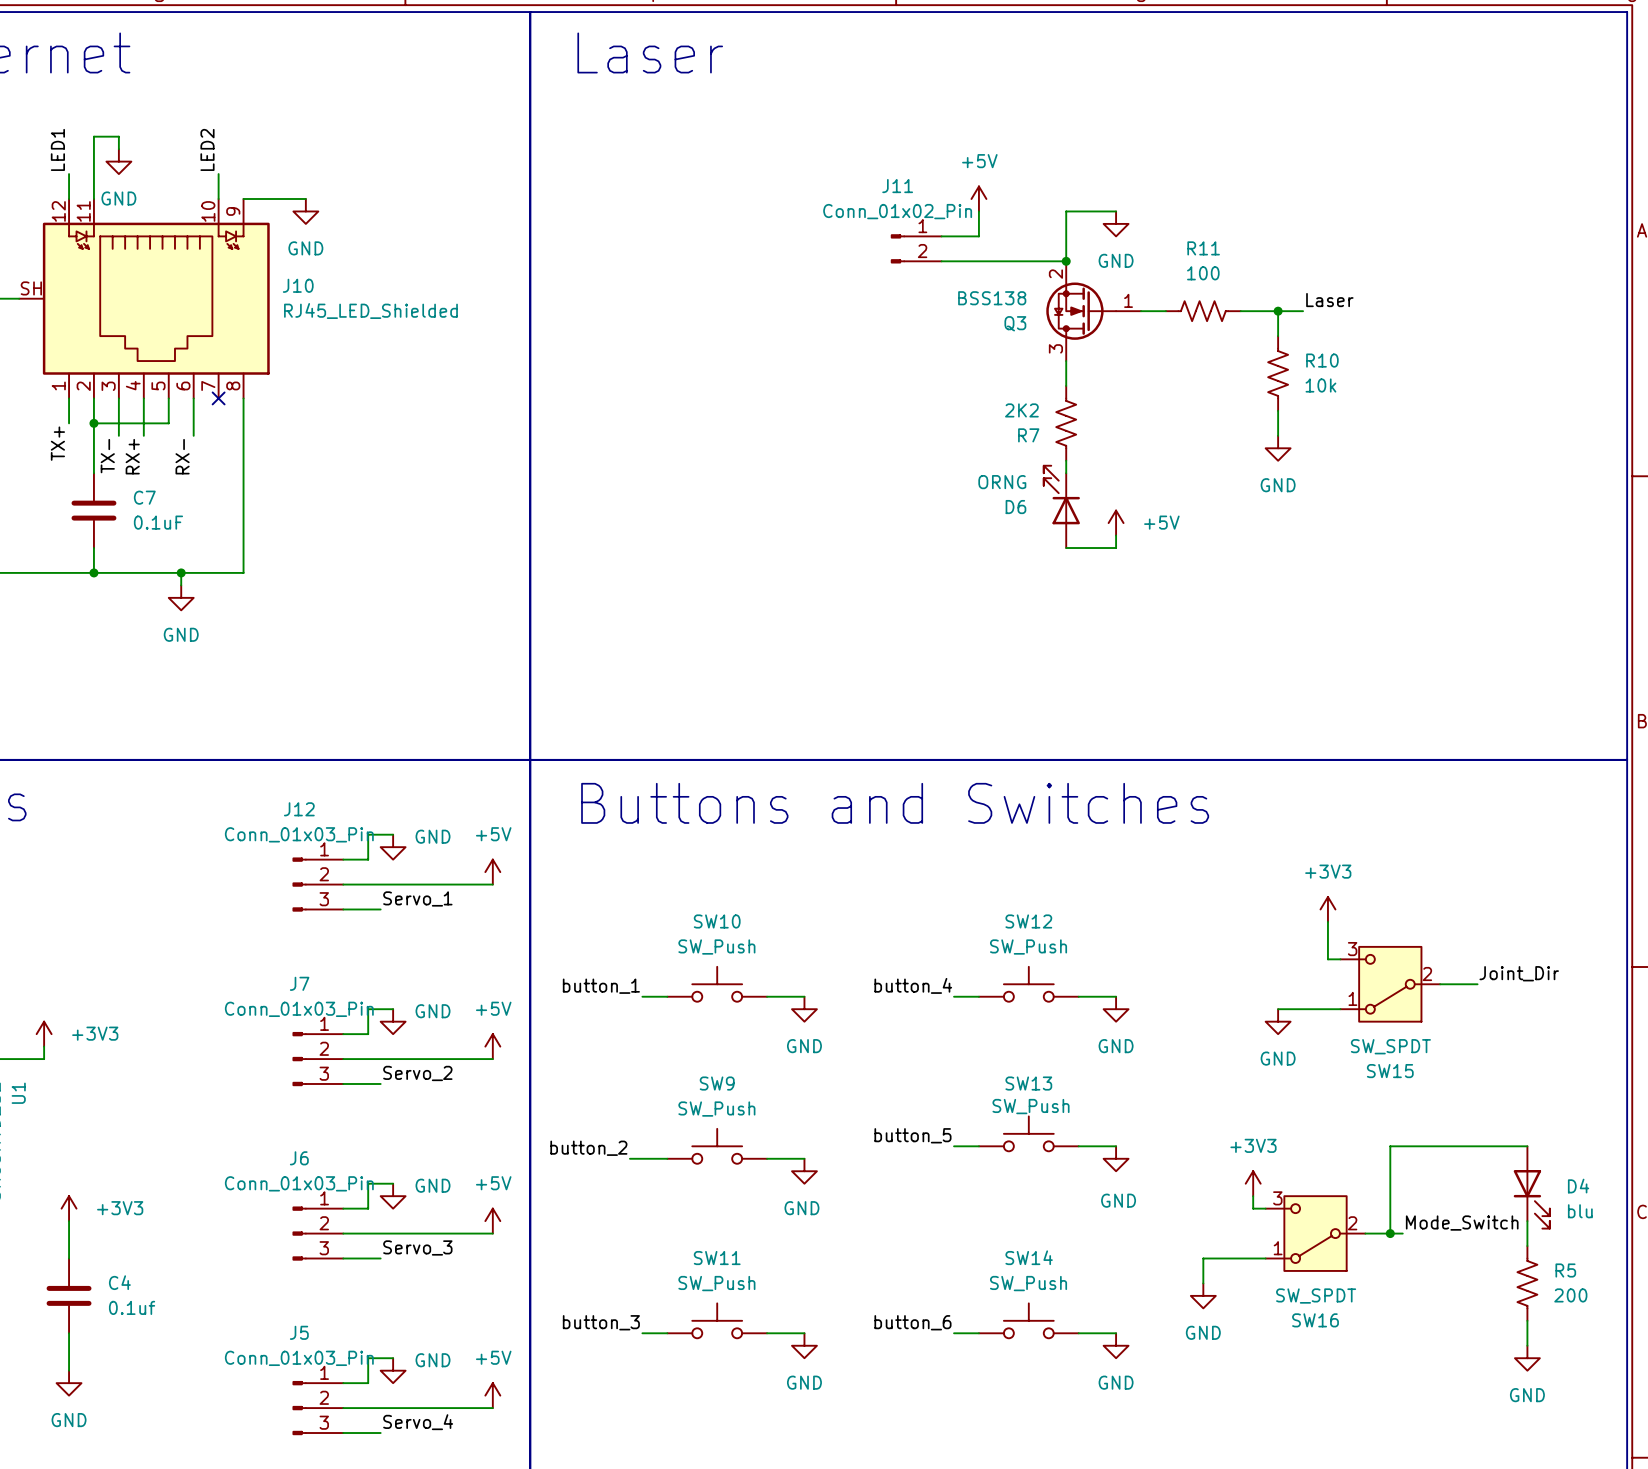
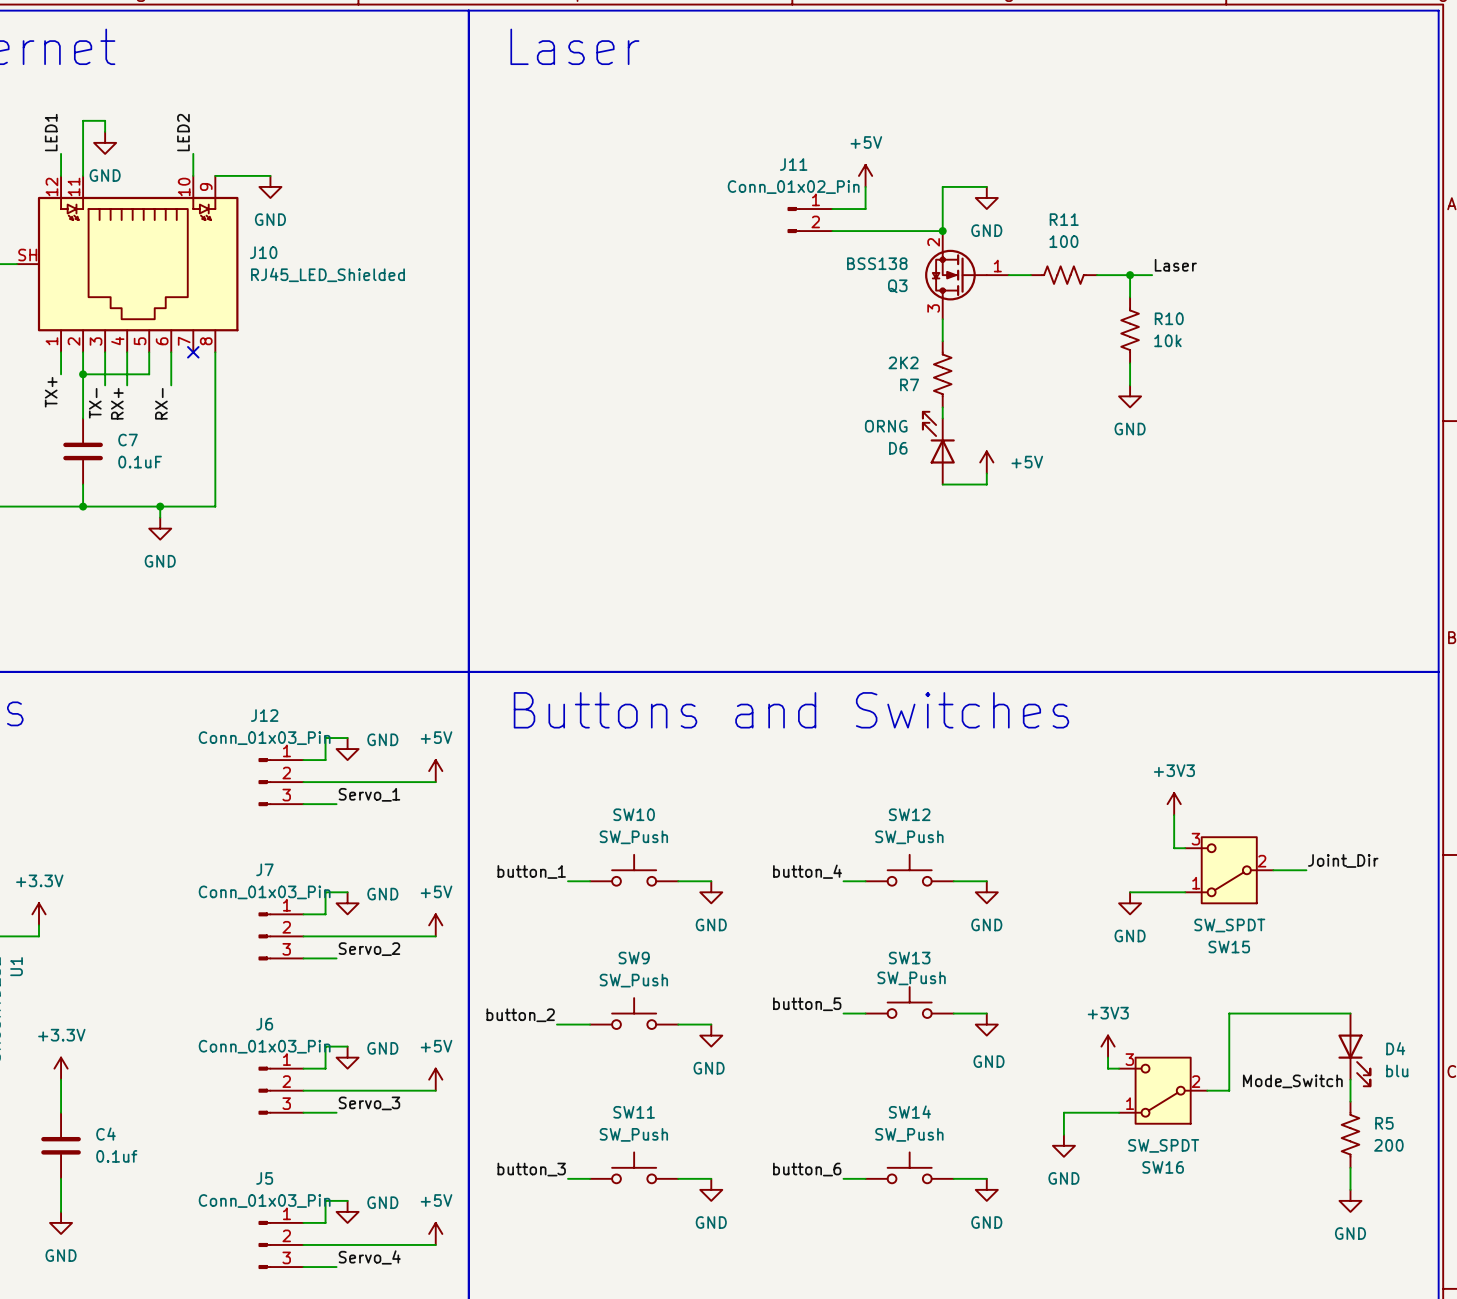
power symbol: +3V3 (44, 1034) -> +3.3V (39, 914)
power symbol: +3V3 (69, 1208) -> +3.3V (61, 1068)
wire: (1390, 1233) (1402, 1233) -> none
junction: (1390, 1233) -> none

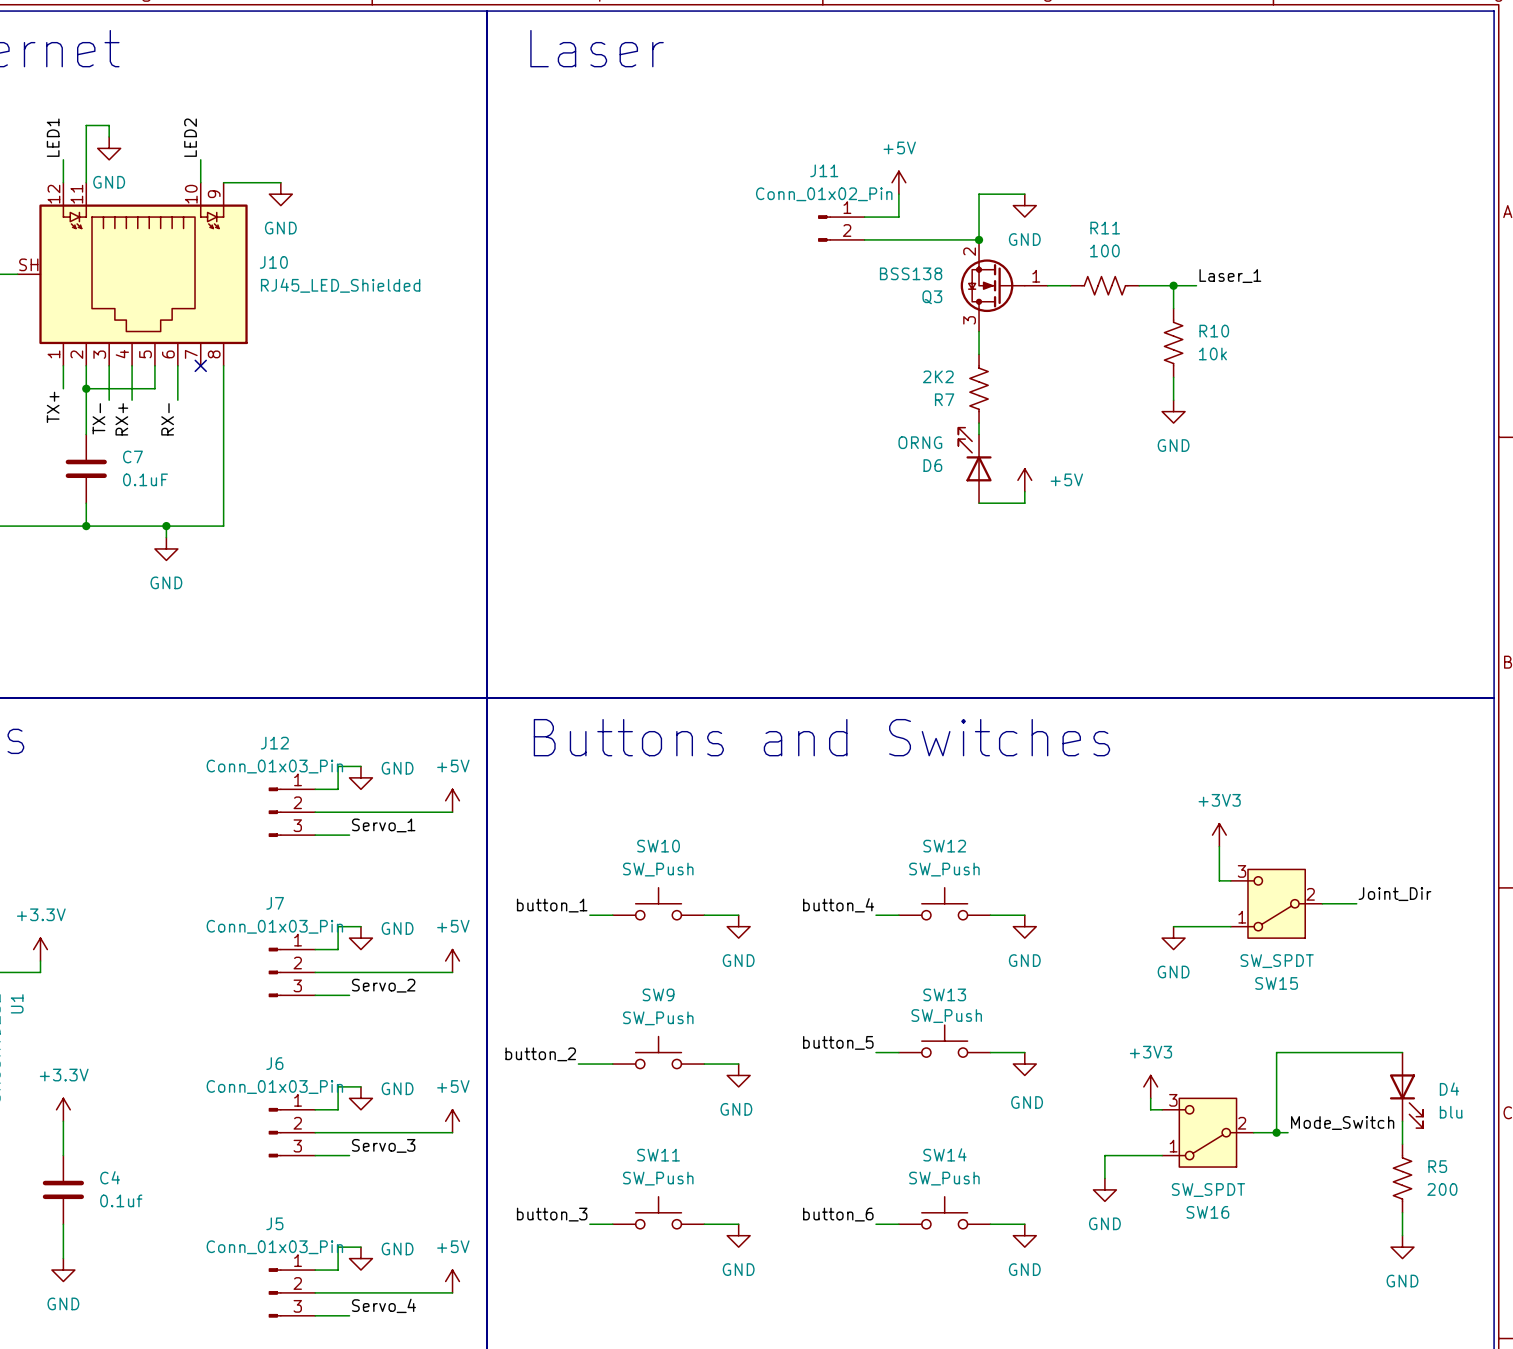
label: Laser (1175, 265) -> Laser_1 (1230, 276)
wire: none -> (1276, 1132) (1288, 1132)
junction: none -> (1276, 1132)

